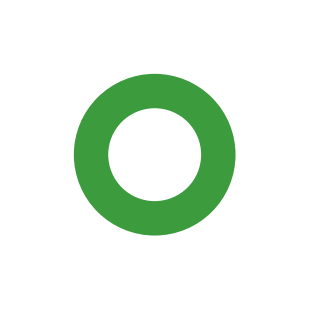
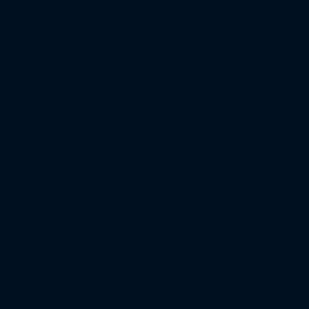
part: (154, 154) -> none

